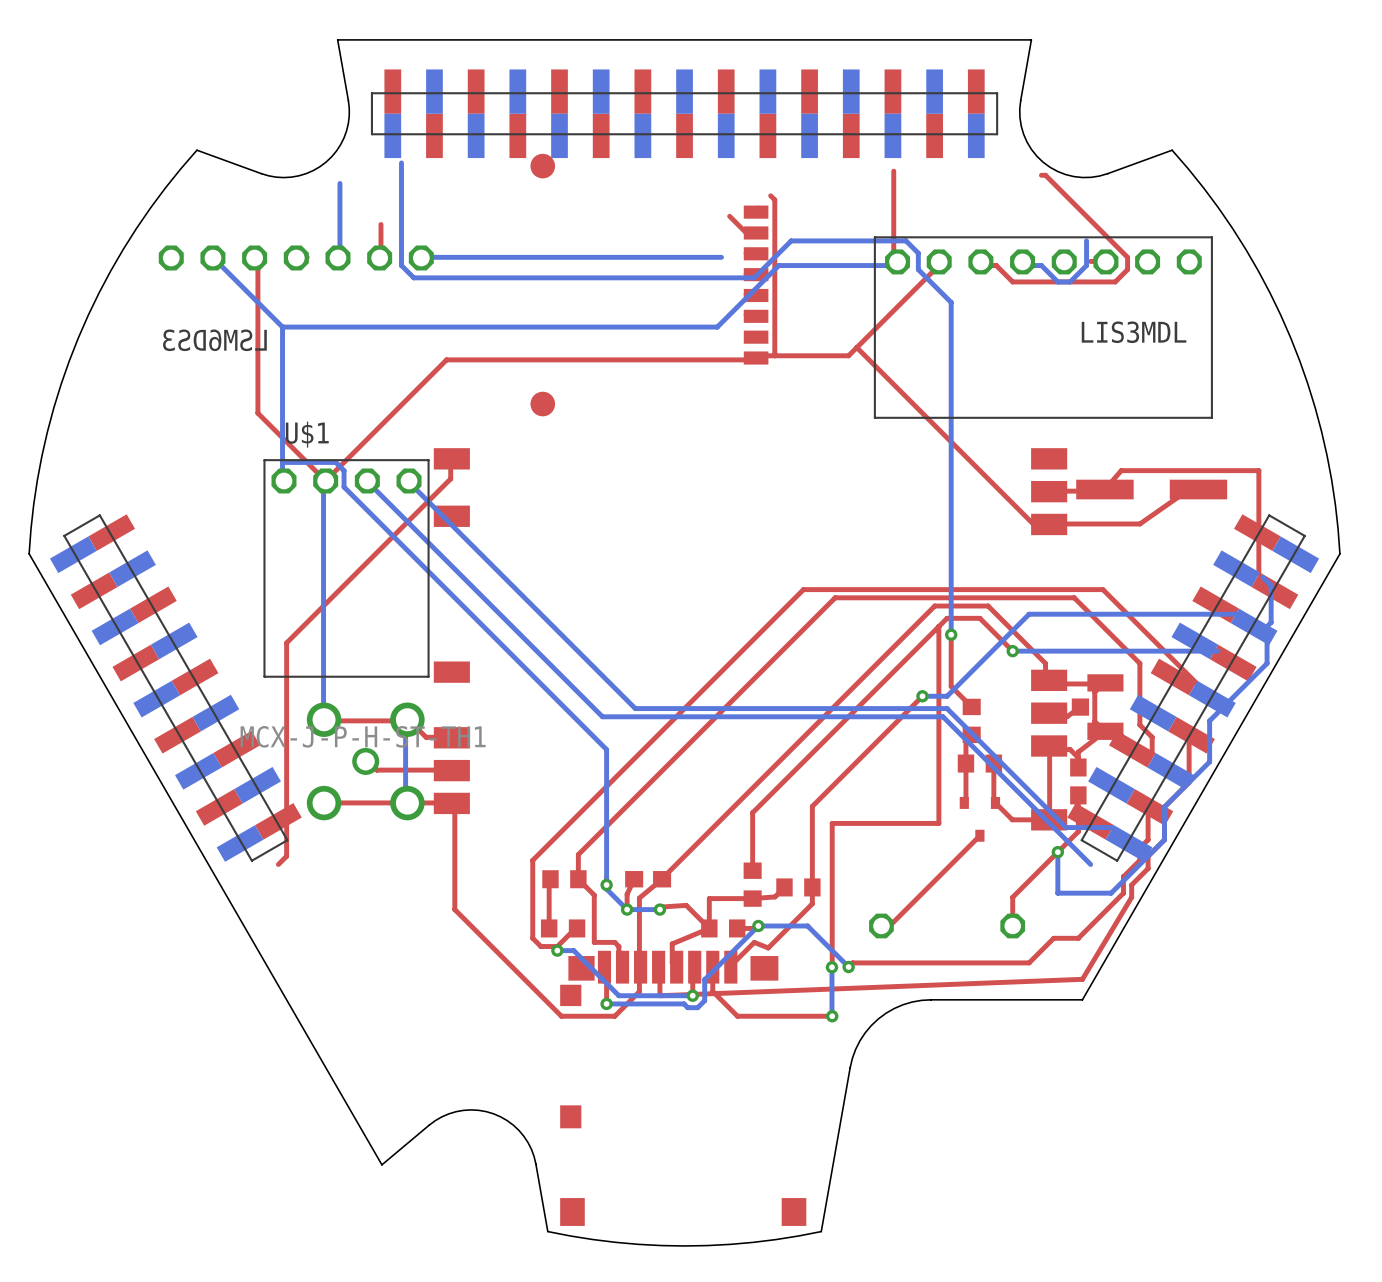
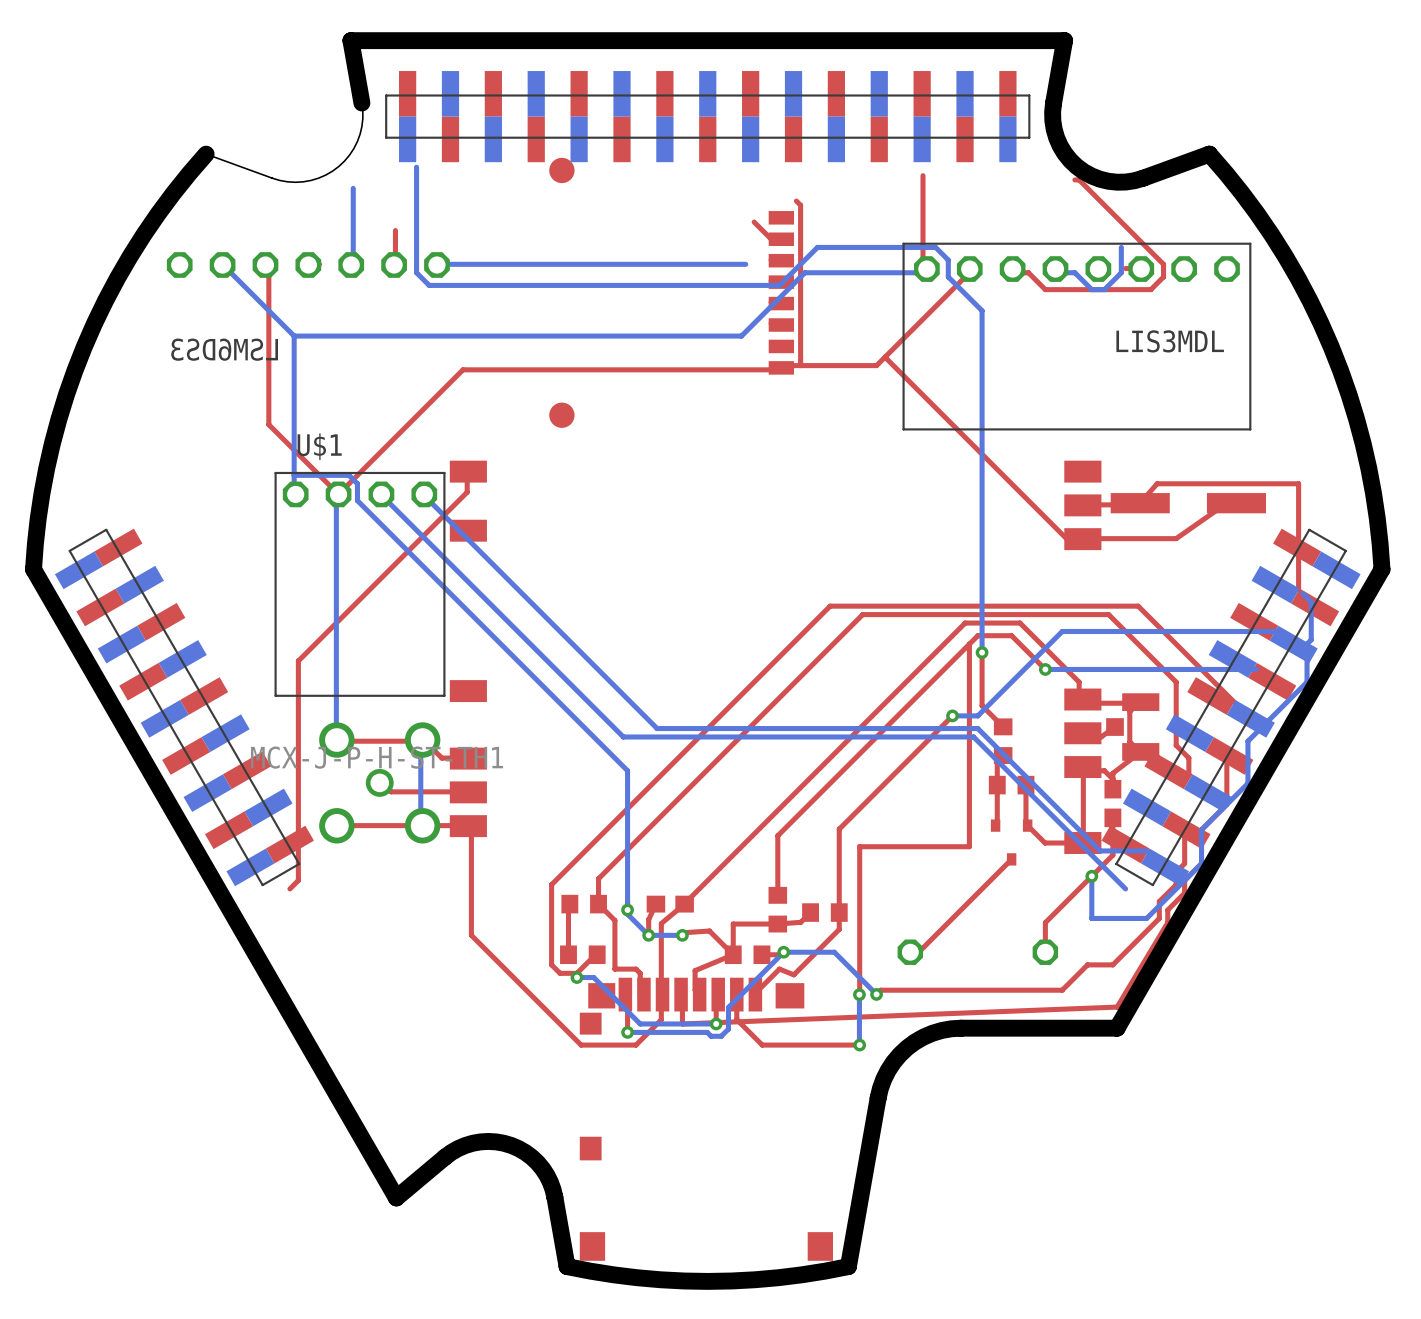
board edge width: thin (348, 100) (337, 39) (1031, 39) (1020, 100) (1019, 117) (1027, 142) (1036, 156) (1050, 167) (1065, 174) (1091, 177) (1107, 173) (1172, 150) (1203, 188) (1232, 228) (1269, 292) (1290, 337) (1307, 384) (1327, 455) (1335, 504) (1339, 553) (1082, 999) (921, 1000) (894, 1008) (878, 1019) (865, 1032) (855, 1049) (850, 1067) (821, 1231) (753, 1242) (684, 1245) (615, 1242) (547, 1231) (535, 1164) (528, 1142) (519, 1130) (507, 1120) (493, 1113) (478, 1110) (456, 1111) (441, 1116) (381, 1164) (29, 553) (33, 504) (41, 455) (61, 384) (78, 337) (99, 292) (136, 228) (165, 188) (196, 150) -> thick (361, 103) (350, 40) (1064, 40) (1053, 103) (1052, 120) (1060, 145) (1070, 160) (1083, 171) (1099, 179) (1125, 182) (1143, 178) (1209, 154) (1242, 193) (1271, 234) (1309, 300) (1331, 346) (1349, 394) (1368, 468) (1377, 518) (1382, 569) (1117, 1028) (951, 1028) (923, 1037) (907, 1047) (893, 1062) (883, 1079) (878, 1097) (848, 1266) (778, 1277) (707, 1281) (637, 1277) (567, 1266) (554, 1197) (546, 1175) (537, 1162) (525, 1152) (511, 1145) (496, 1141) (472, 1143) (458, 1148) (396, 1197) (33, 569) (38, 518) (46, 468) (66, 394) (84, 346) (105, 300) (143, 234) (173, 193) (206, 154)

